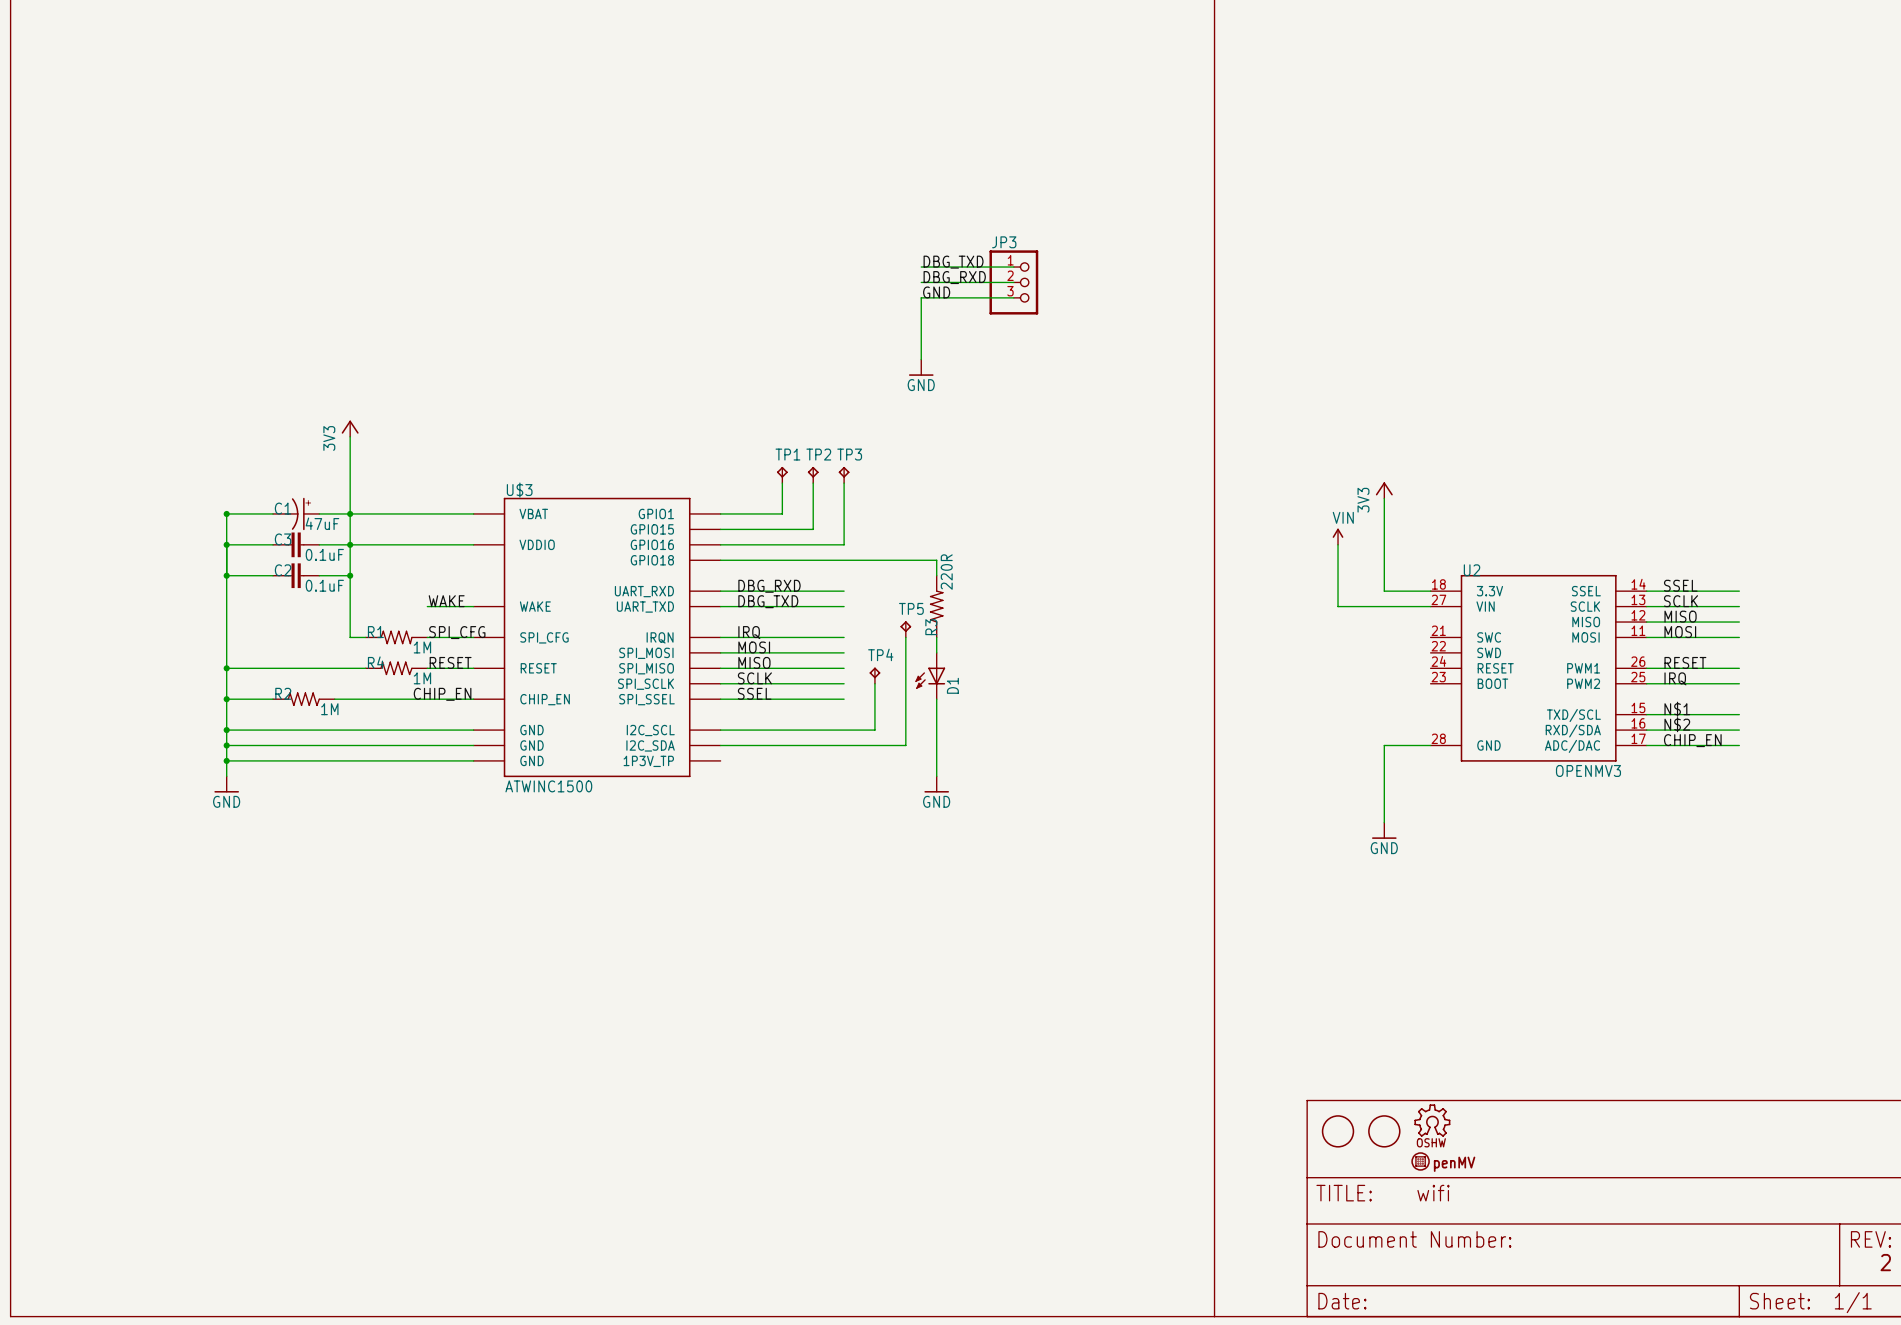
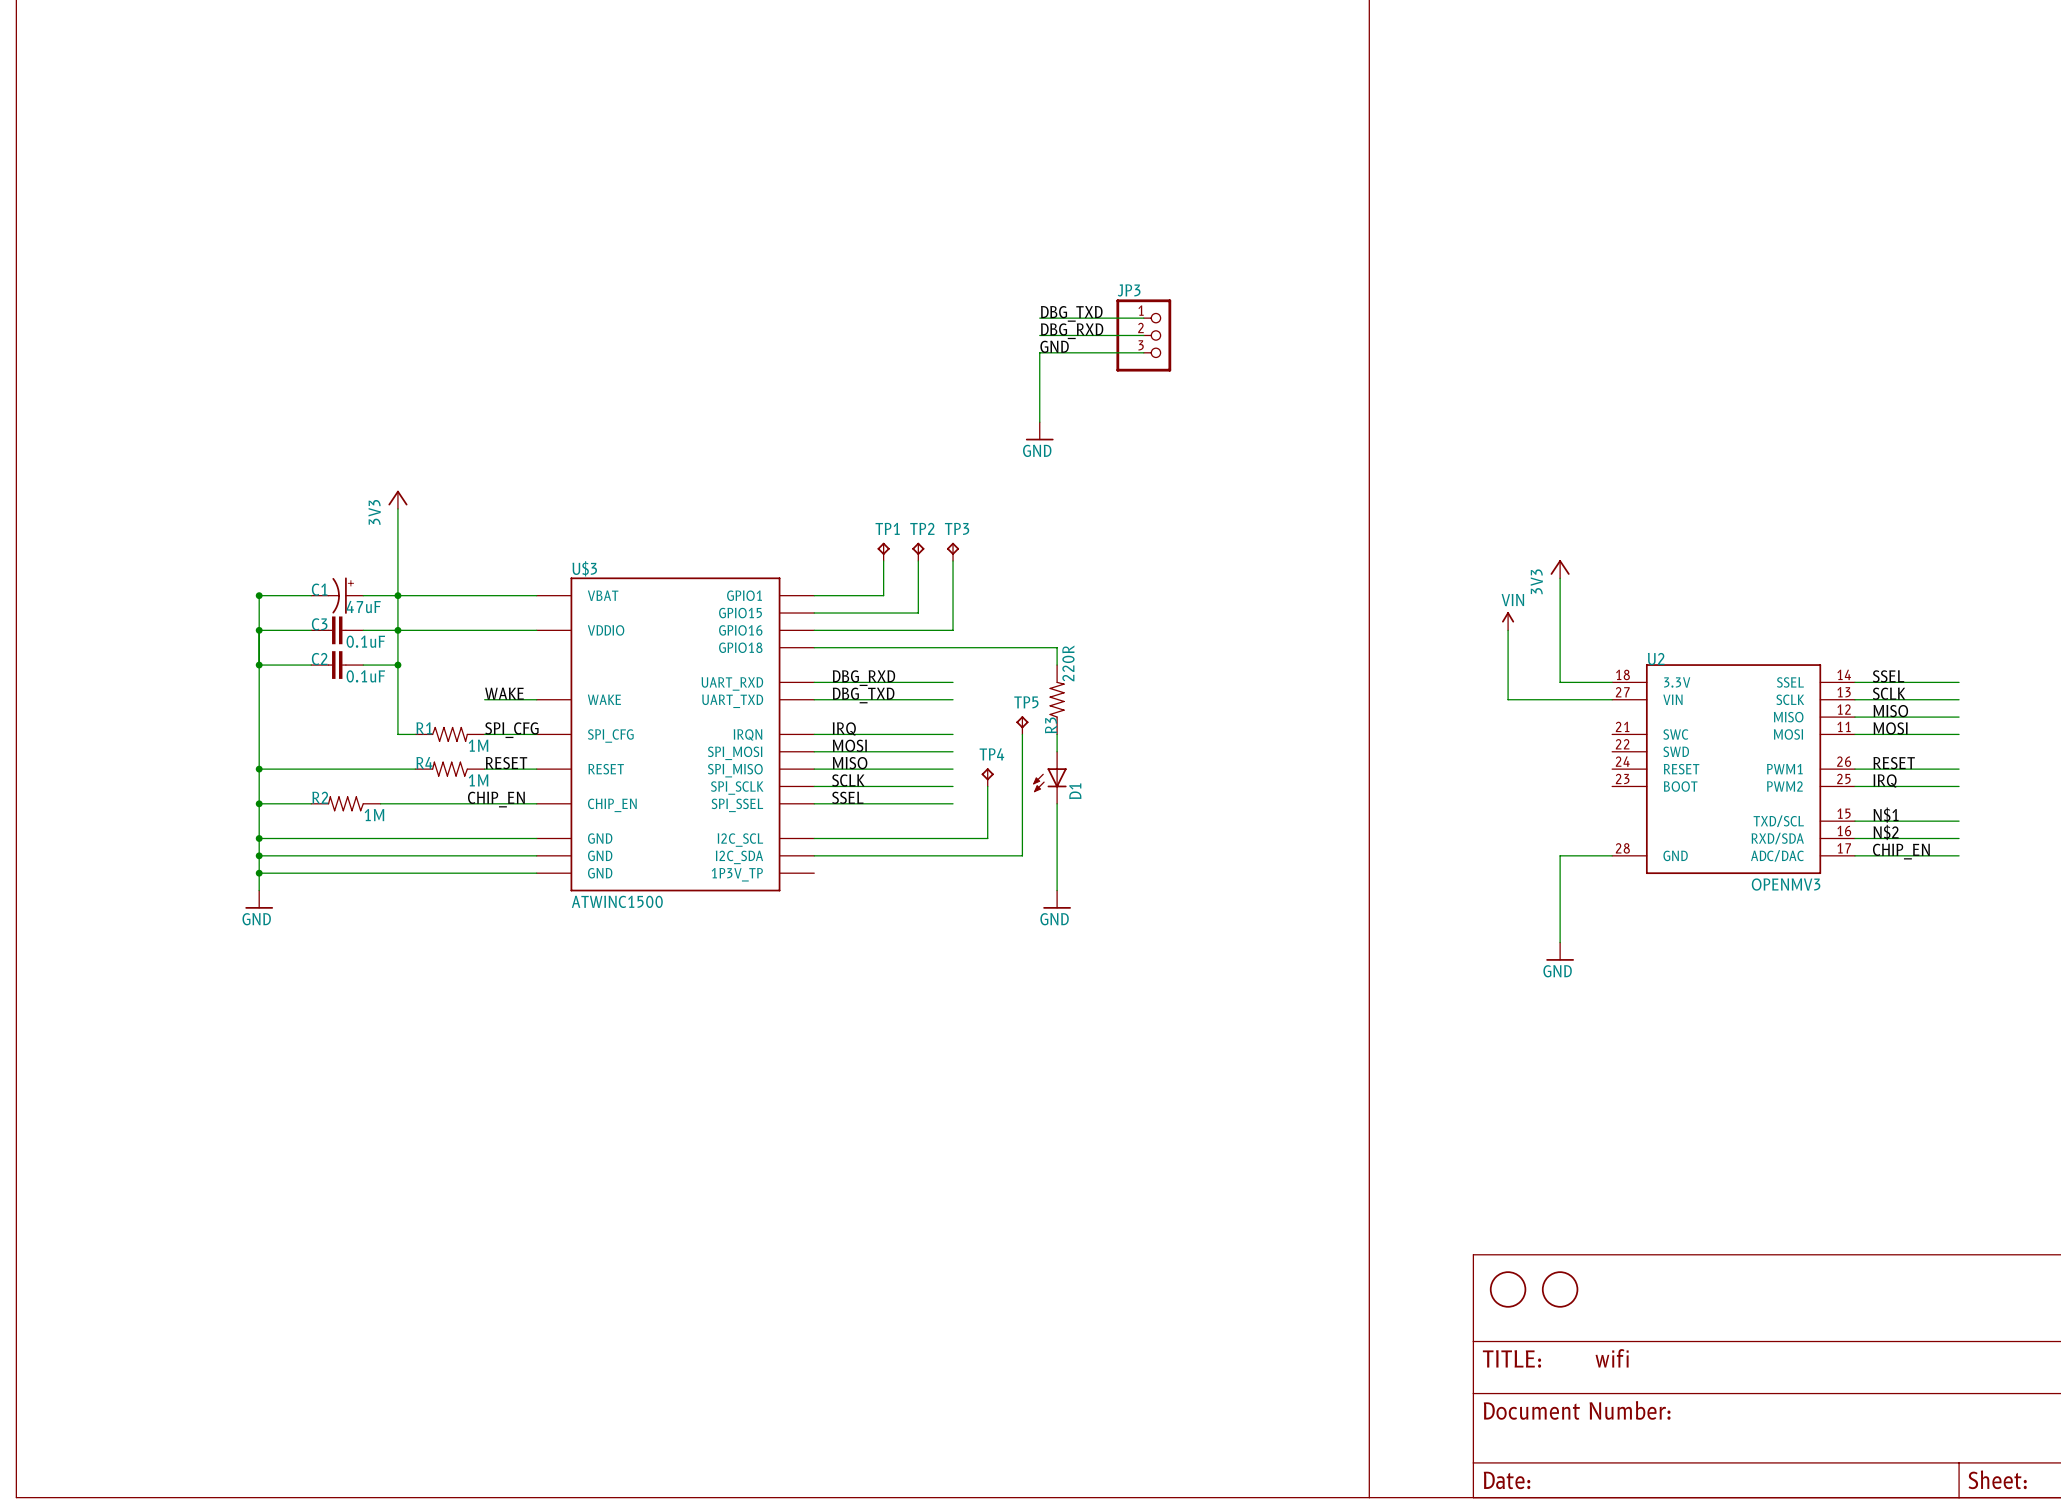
part: (1432, 1120) -> none
part: (1420, 1161) -> none

